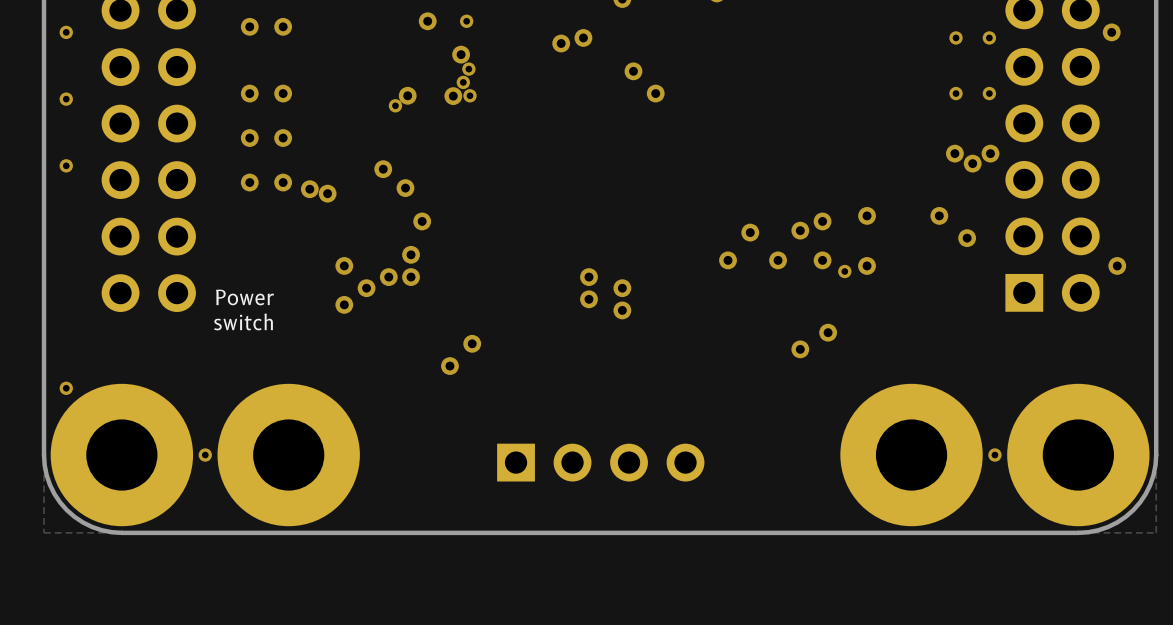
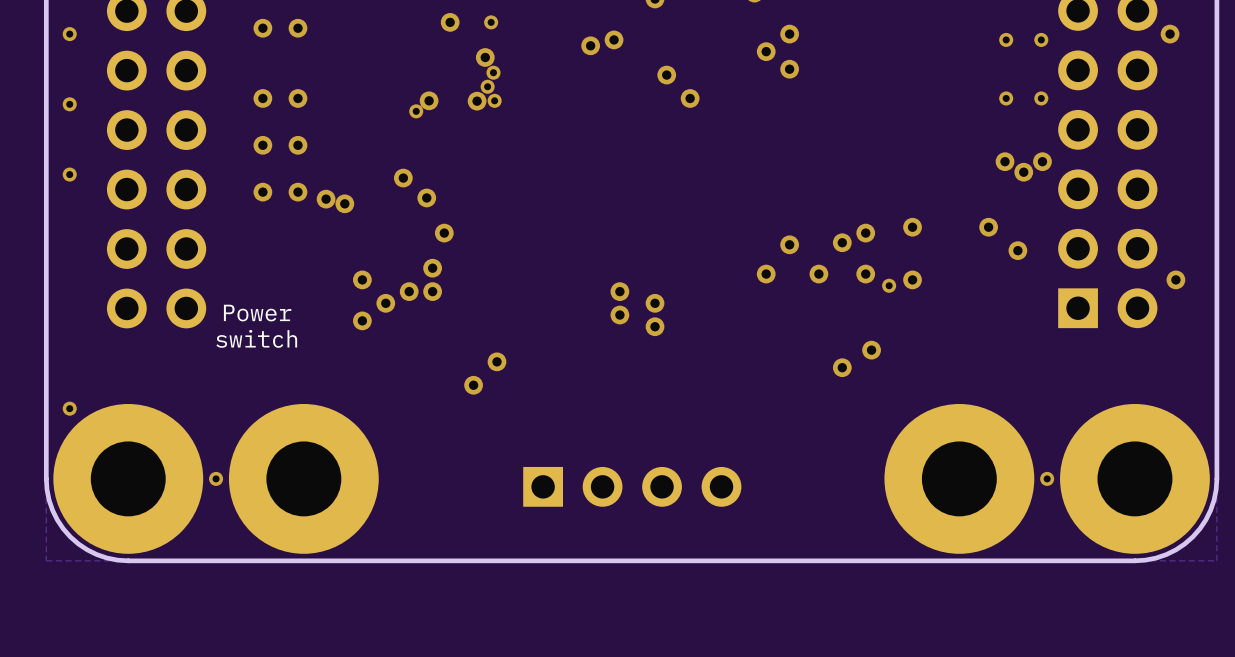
via: none -> (789, 34)
via: none -> (766, 51)
via: none -> (789, 69)

